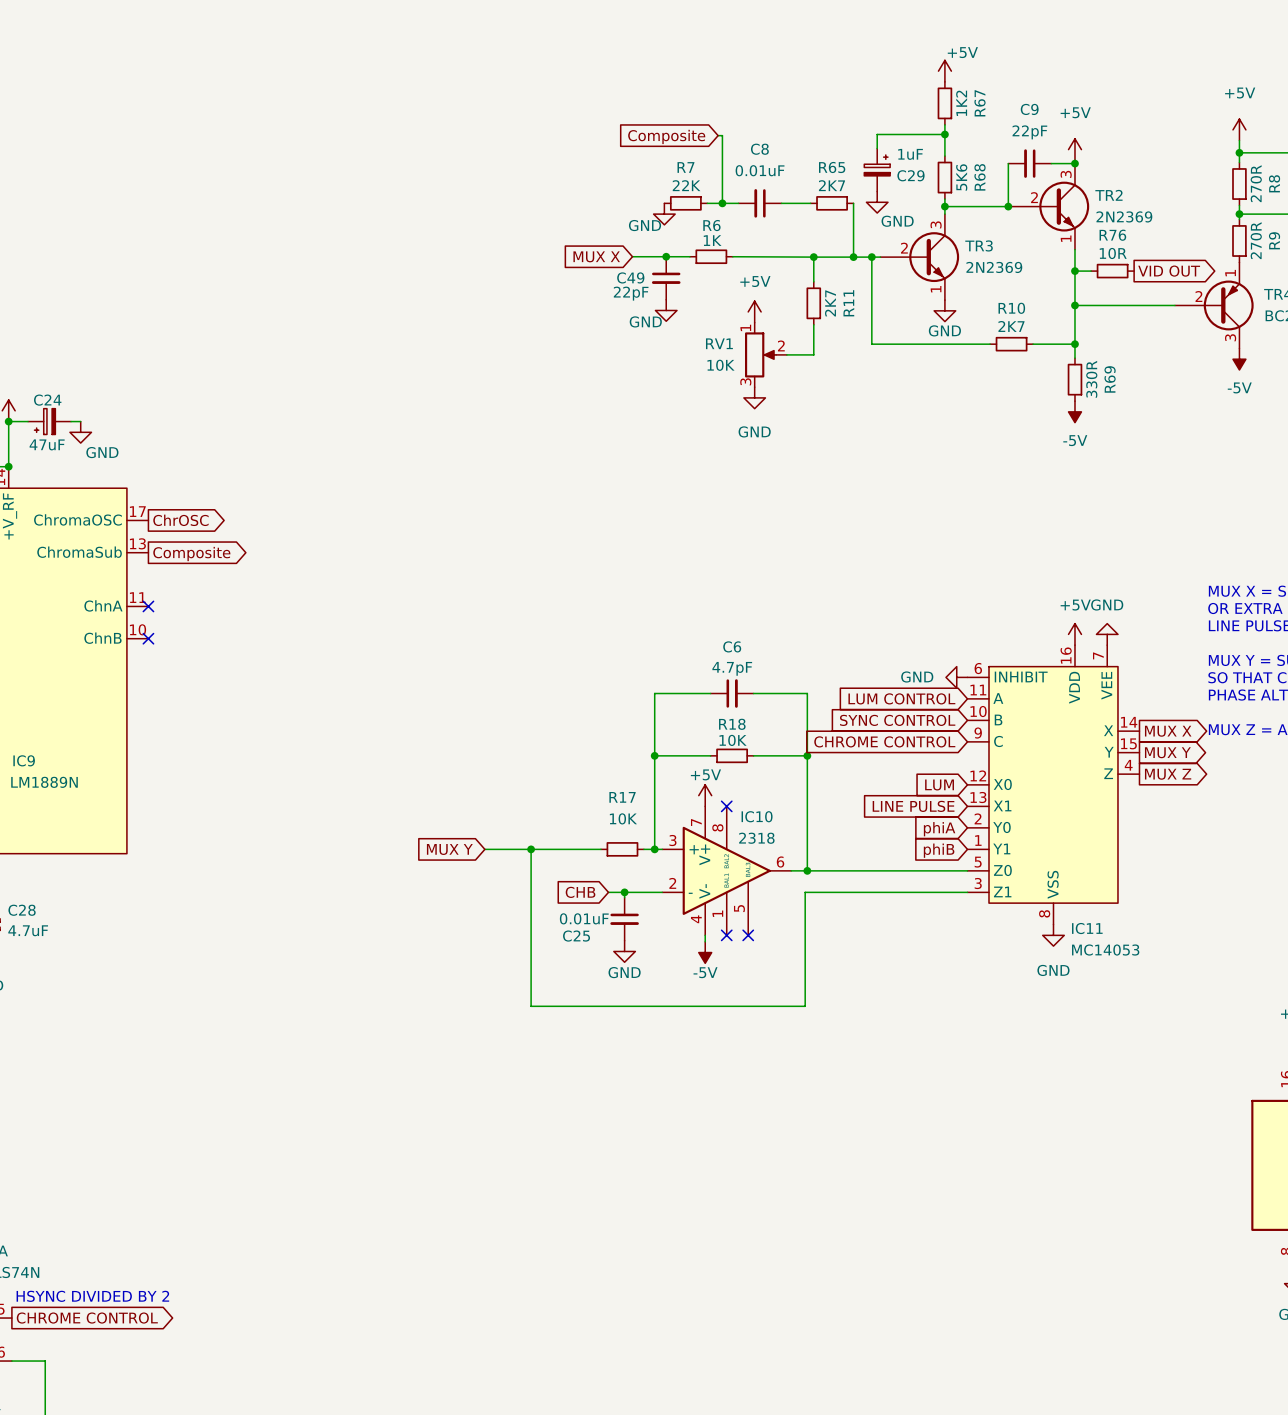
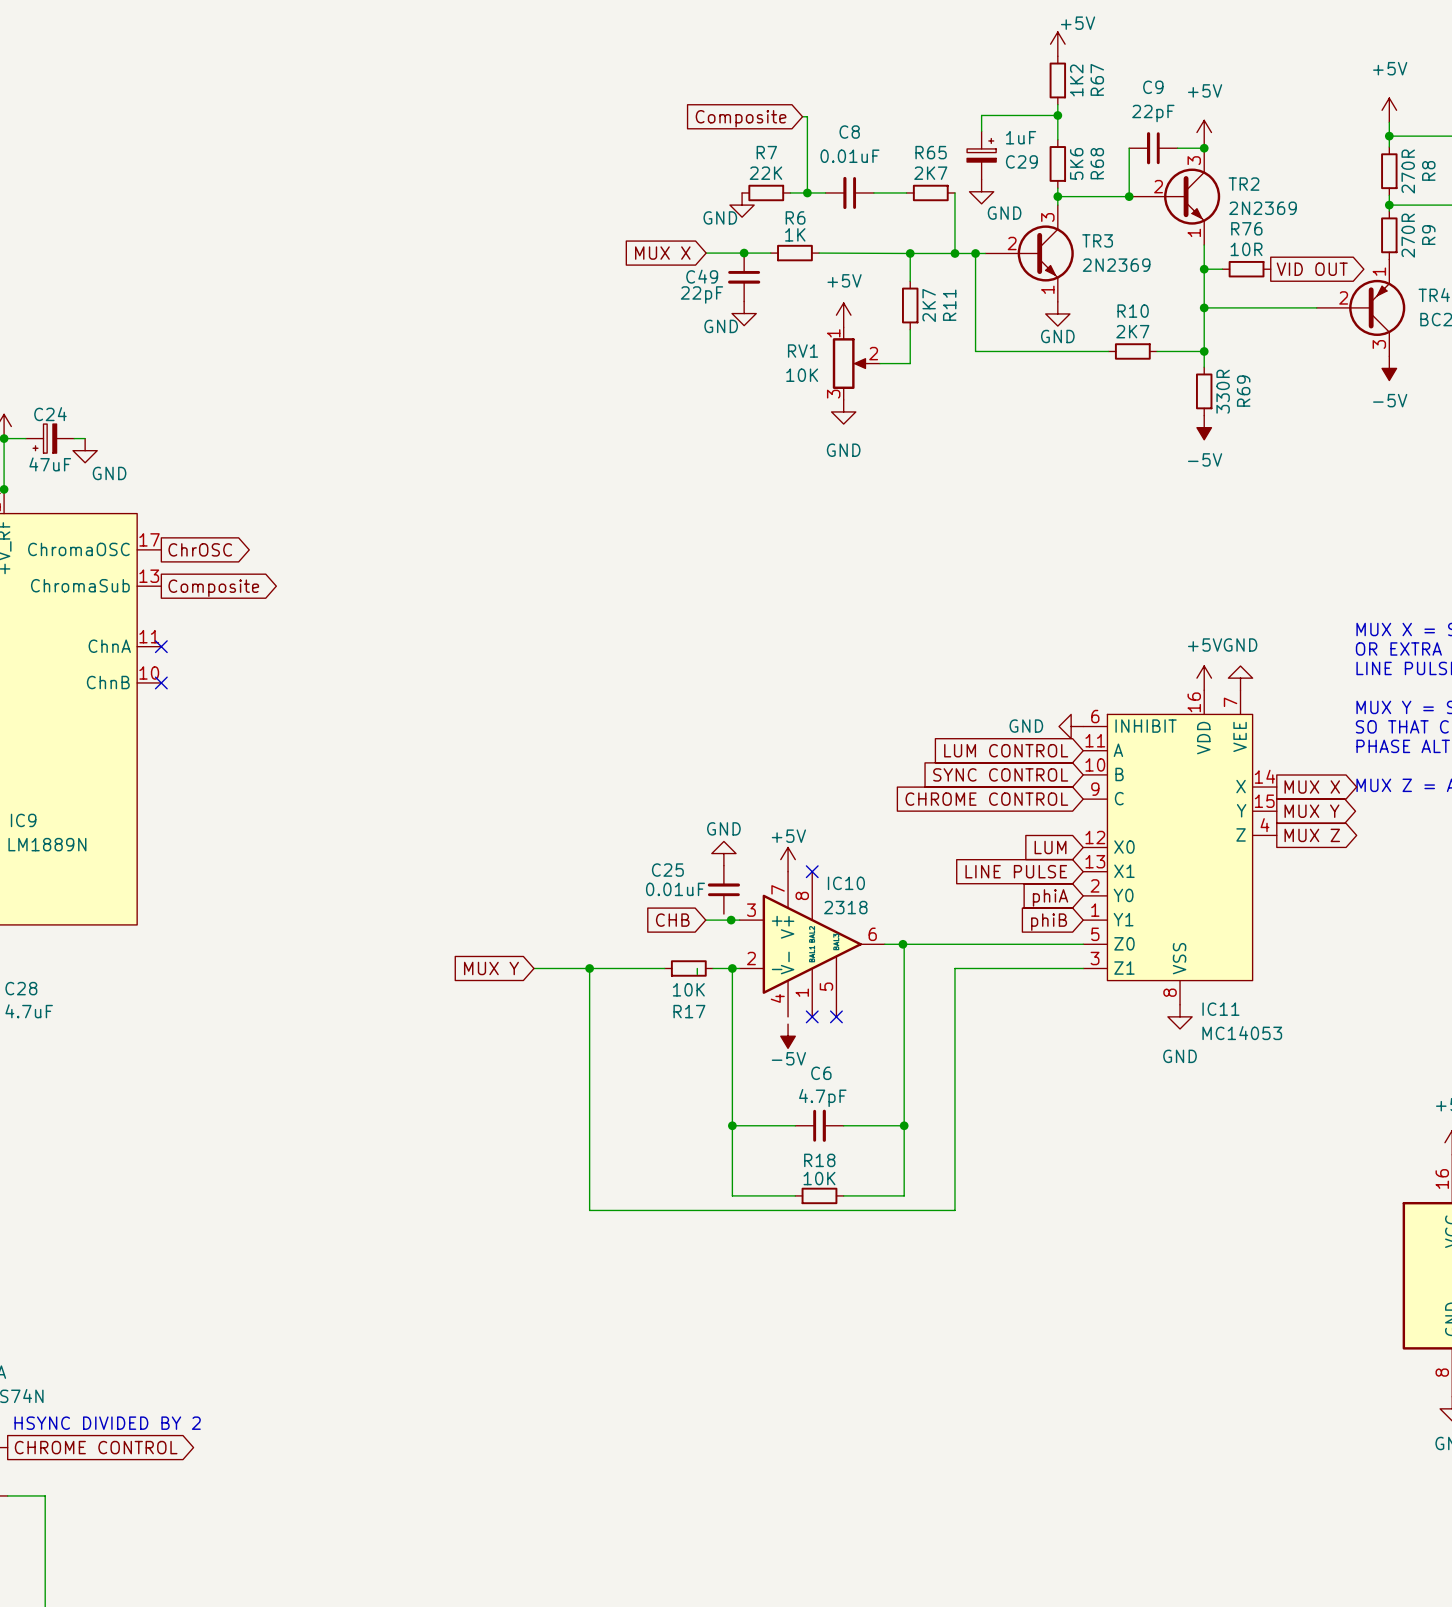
wire: (710, 693) (654, 693) (654, 849) -> none
C6 position: (732, 693) -> (819, 1125)
wire: (753, 693) (807, 693) (807, 870) -> none
wire: (654, 755) (710, 755) -> none
junction: (654, 755) -> none
R18 position: (732, 755) -> (819, 1195)
wire: (753, 755) (807, 755) -> none
junction: (807, 755) -> none
R17 name position: R17 (622, 797) -> R17 (689, 1011)
R17 value position: 10K (623, 818) -> 10K (688, 989)
global label position: MUX Y (449, 849) -> MUX Y (491, 968)
wire: (484, 849) (600, 849) -> (533, 968) (664, 968)
wire: (531, 849) (531, 1006) (805, 1006) (805, 892) (853, 892) -> (589, 968) (589, 1210) (954, 1210) (954, 968)
junction position: (531, 849) -> (589, 968)
R17 position: (622, 849) -> (688, 968)
wire: none -> (904, 944) (904, 1195) (843, 1195)
global label position: CHB (580, 892) -> CHB (672, 920)
wire: (608, 892) (638, 892) -> none
junction position: (624, 892) -> (732, 968)
wire: none -> (732, 968) (732, 1195) (795, 1195)
C25 rotation: 0° (624, 919) -> 180° (723, 889)
C25 position: (624, 919) -> (723, 889)
wire: (705, 935) (705, 941) -> none
C25 name position: C25 (576, 936) -> C25 (667, 870)
power symbol rotation: 0° (624, 951) -> 180° (723, 853)
power symbol position: GND (624, 951) -> GND (723, 853)
wire: none -> (732, 1125) (795, 1125)
junction: none -> (732, 1125)
wire: none -> (843, 1125) (904, 1125)
junction: none -> (904, 1125)

